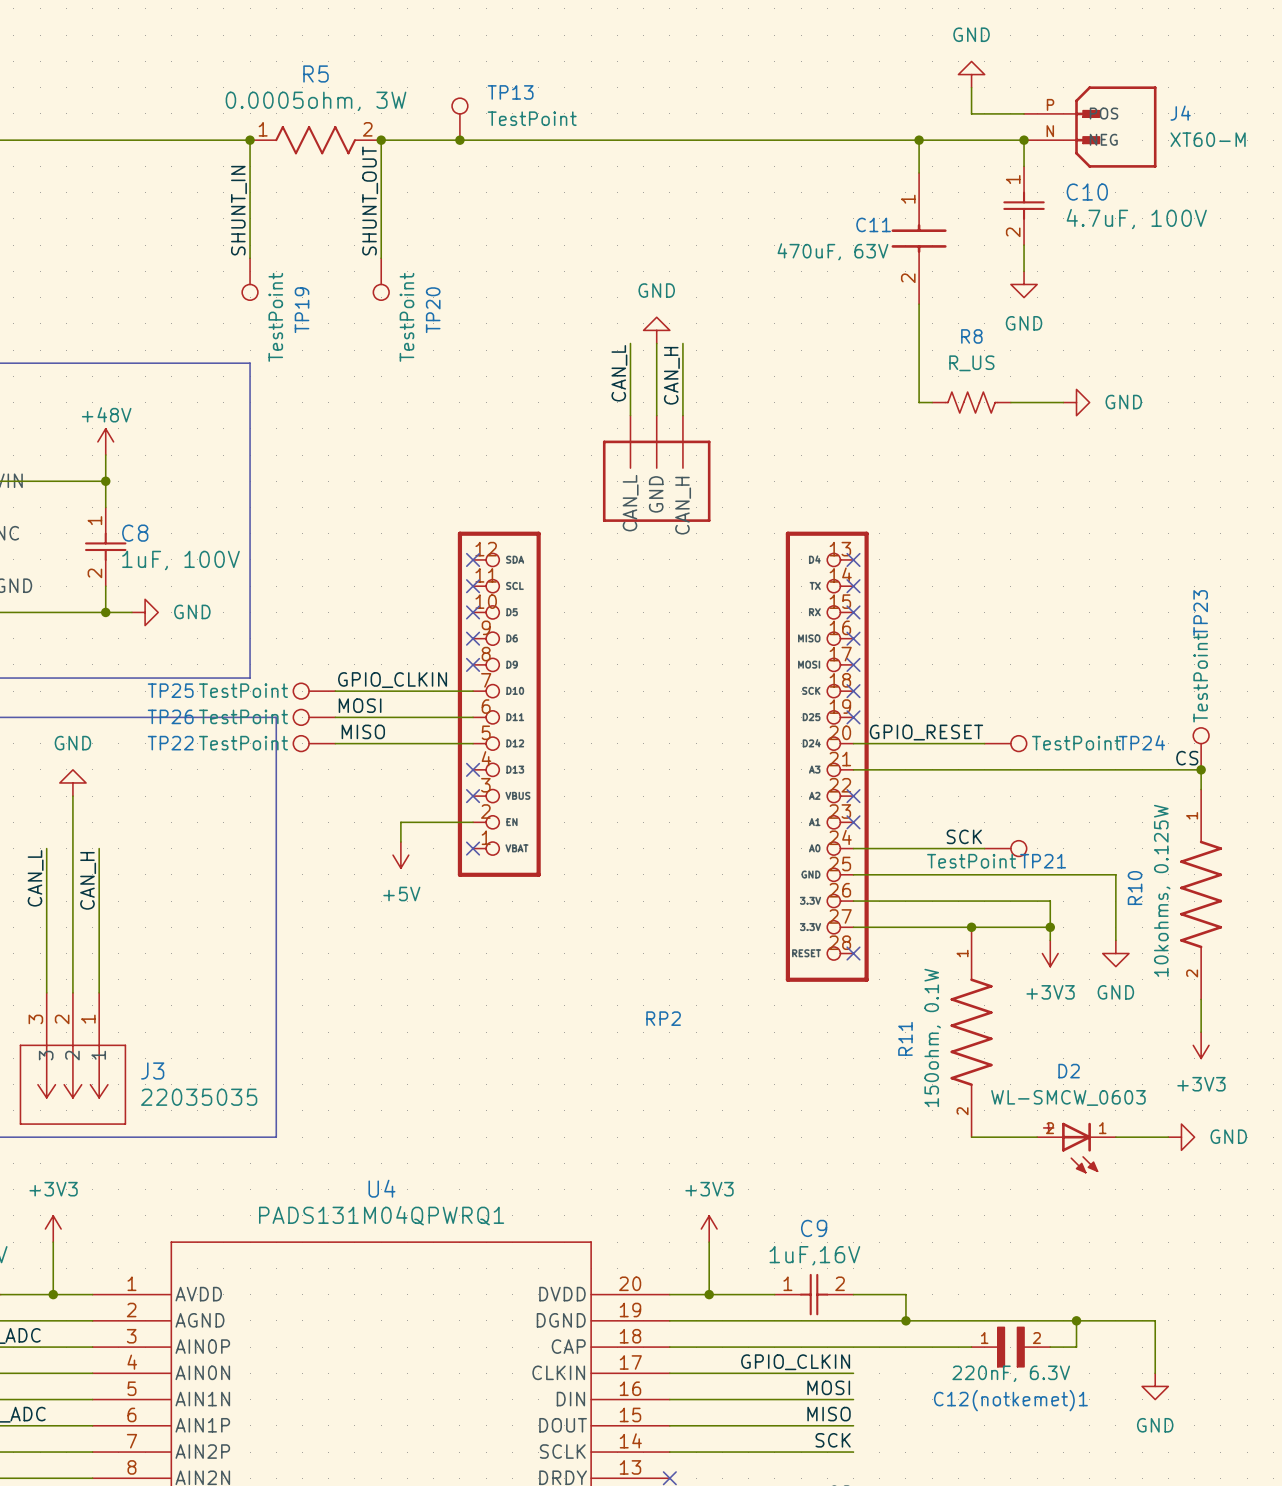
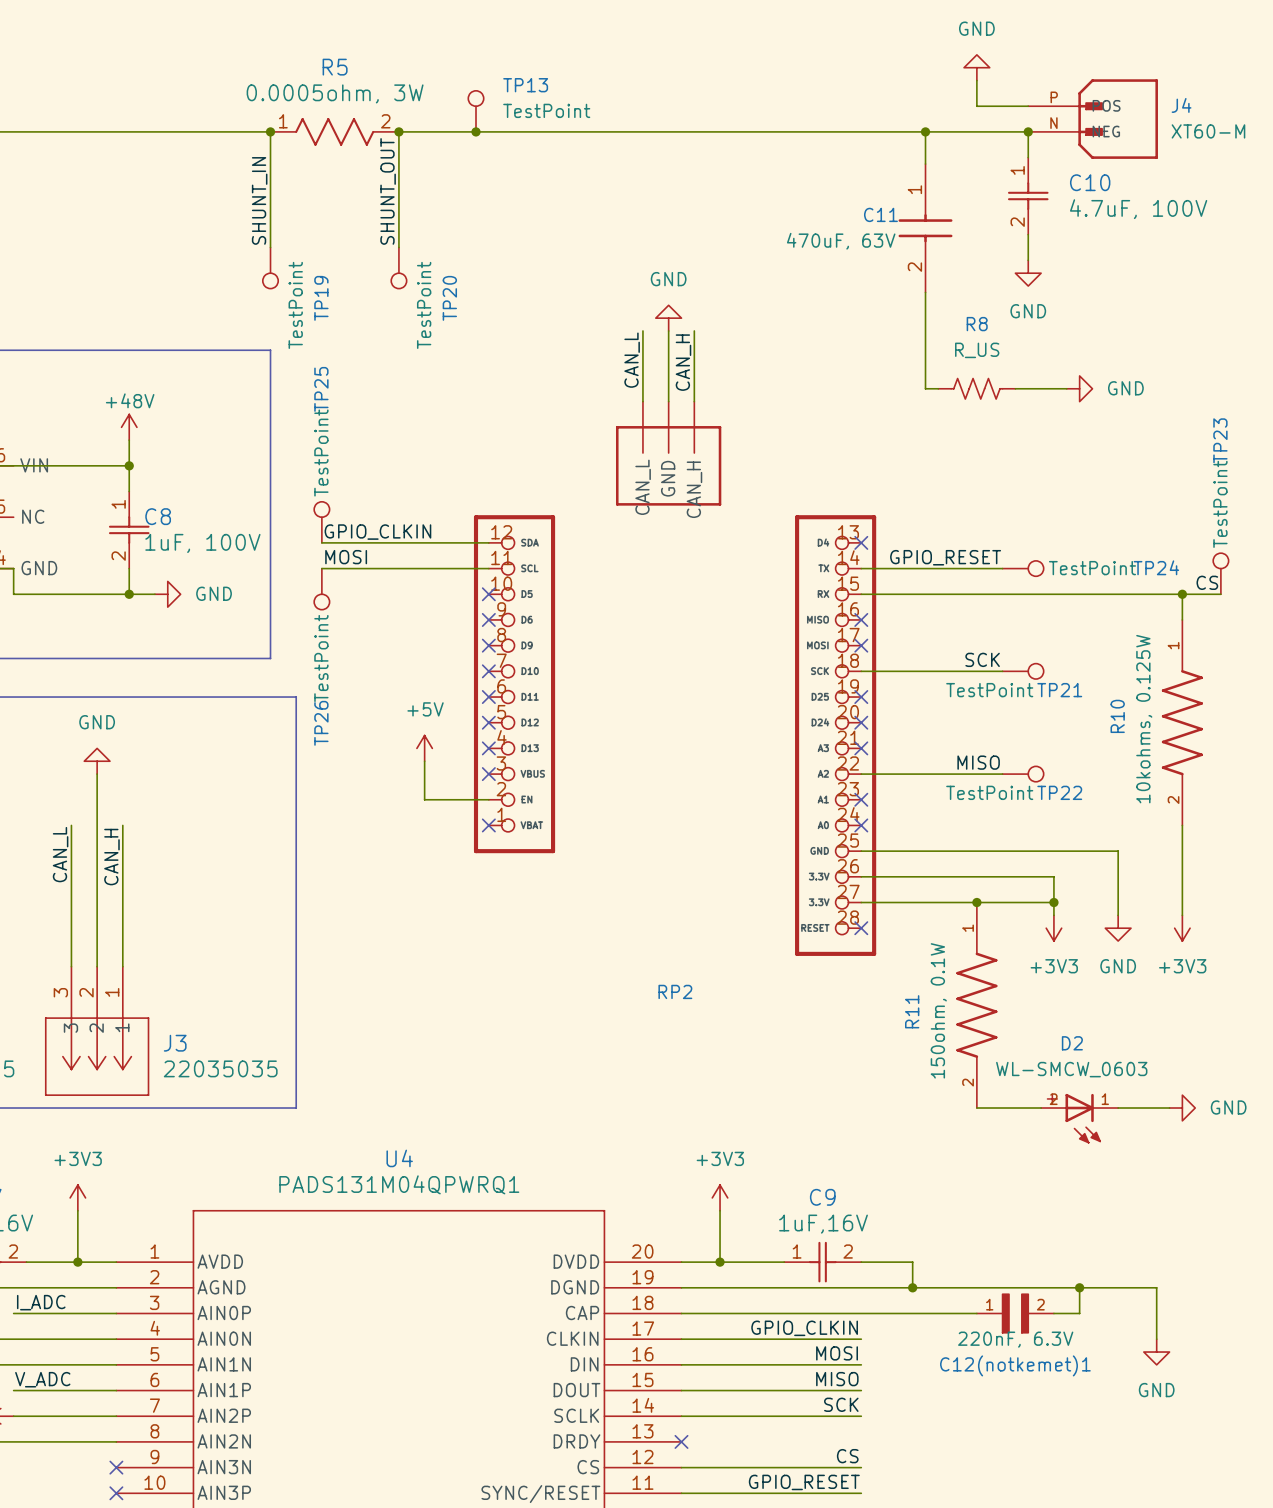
wire: none -> (321, 542) (488, 542)
no-connect mark: (473, 559) -> none
wire: none -> (321, 568) (488, 568)
no-connect mark: (473, 586) -> none
wire: none -> (861, 568) (1002, 568)
no-connect mark: (853, 586) -> none
wire: none -> (861, 594) (1220, 594)
no-connect mark: (853, 612) -> none
wire: none -> (1182, 594) (1182, 619)
junction: none -> (1182, 594)
label position: GPIO_CLKIN (392, 680) -> GPIO_CLKIN (377, 532)
TP25 rotation: 0° (301, 691) -> 90° clockwise (321, 509)
TP25 position: (314, 691) -> (321, 522)
wire: (335, 691) (473, 691) -> none
no-connect mark: none -> (488, 671)
wire: none -> (861, 671) (1002, 671)
no-connect mark: (853, 691) -> none
label position: MOSI (360, 705) -> MOSI (346, 557)
TP26 rotation: 0° (301, 717) -> 90° counterclockwise (321, 601)
TP26 position: (314, 717) -> (321, 589)
wire: (335, 717) (473, 717) -> none
no-connect mark: none -> (488, 697)
label: MISO (363, 731) -> none
label position: GPIO_RESET (926, 732) -> GPIO_RESET (945, 557)
TP22 name position: TP22 (170, 743) -> TP22 (1059, 792)
TP22 value position: TestPoint (243, 743) -> TestPoint (989, 792)
TP22 rotation: 0° (301, 743) -> 180° (1035, 774)
TP22 position: (314, 743) -> (1023, 774)
wire: (335, 743) (473, 743) -> none
no-connect mark: none -> (488, 722)
wire: (853, 743) (984, 743) -> none
no-connect mark: none -> (861, 722)
TP24 position: (1005, 743) -> (1023, 568)
TP23 position: (1201, 748) -> (1220, 573)
label position: CS (1187, 758) -> CS (1207, 582)
wire: (853, 769) (1201, 769) (1201, 789) -> none
no-connect mark: none -> (861, 748)
junction: (1201, 769) -> none
label: none -> MISO (978, 762)
wire: none -> (861, 774) (1002, 774)
no-connect mark: (853, 796) -> none
wire: (407, 822) (400, 822) (400, 842) -> (424, 799) (424, 761)
label position: SCK (964, 836) -> SCK (982, 659)
wire: (853, 848) (984, 848) -> none
no-connect mark: none -> (861, 825)
TP21 position: (1005, 848) -> (1023, 671)
wire: none -> (1182, 825) (1182, 915)
power symbol rotation: 0° (400, 855) -> 180° (424, 748)
power symbol position: +5V (400, 855) -> +5V (424, 748)
TP21 value position: TestPoint (971, 861) -> TestPoint (989, 690)
TP21 name position: TP21 (1043, 861) -> TP21 (1059, 690)
R10 position: (1201, 894) -> (1182, 722)
wire: (1201, 999) (1201, 1032) -> none
power symbol position: +3V3 (1201, 1045) -> +3V3 (1182, 928)

